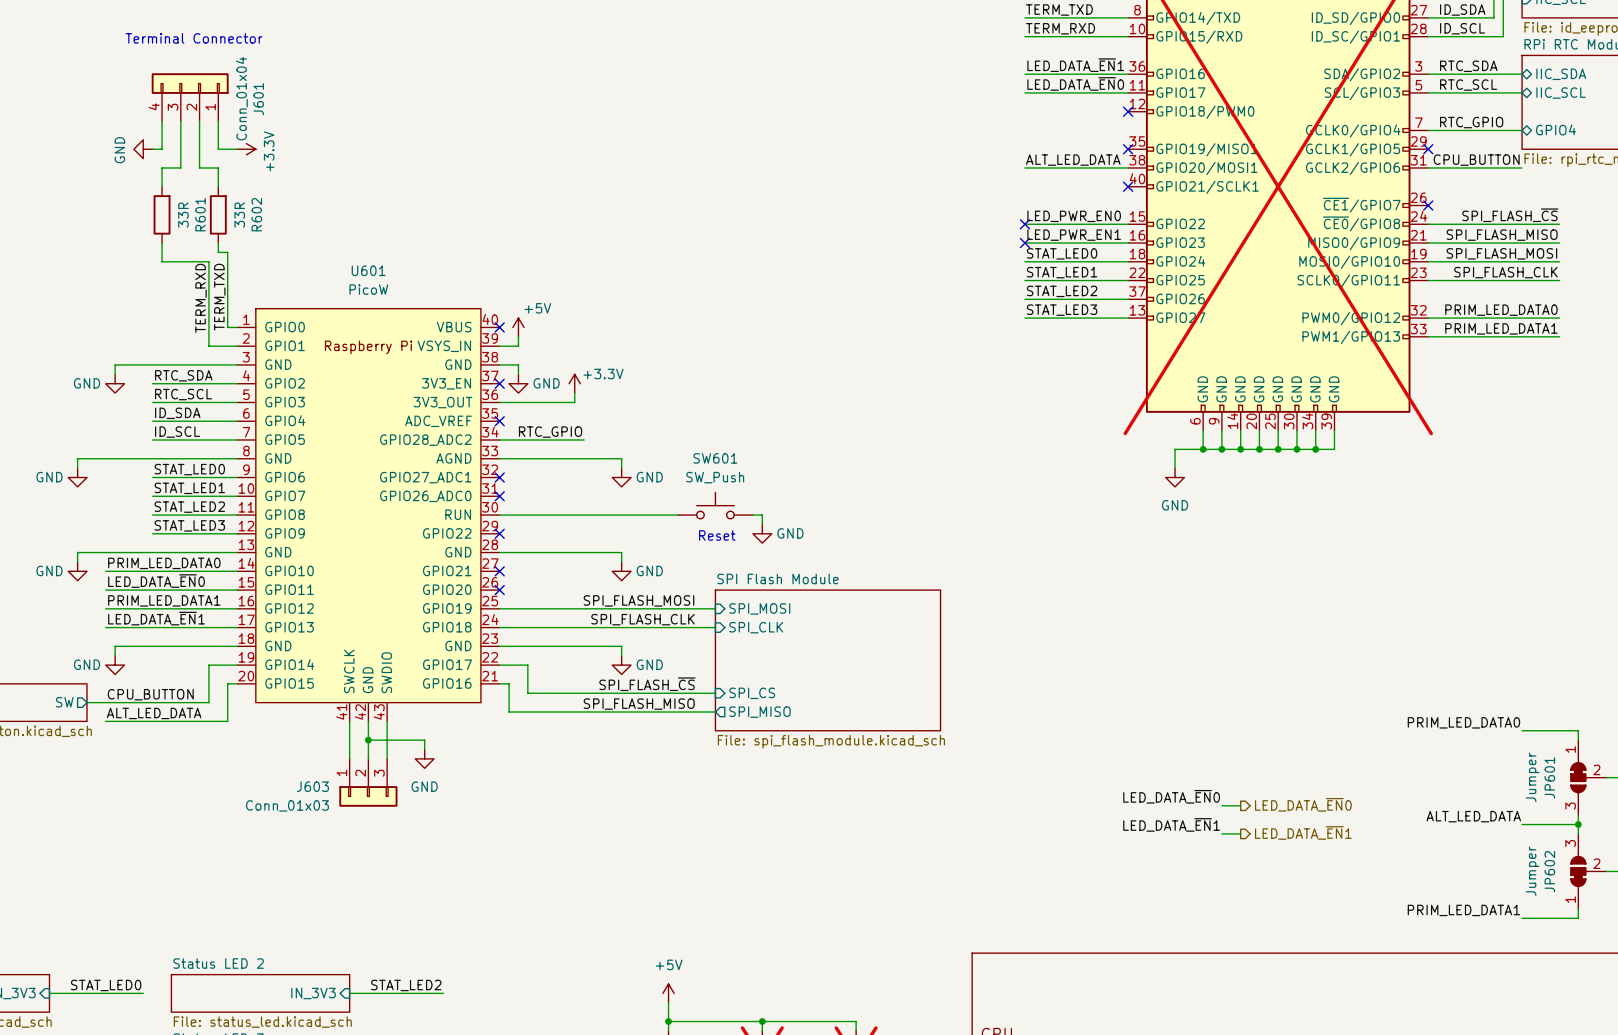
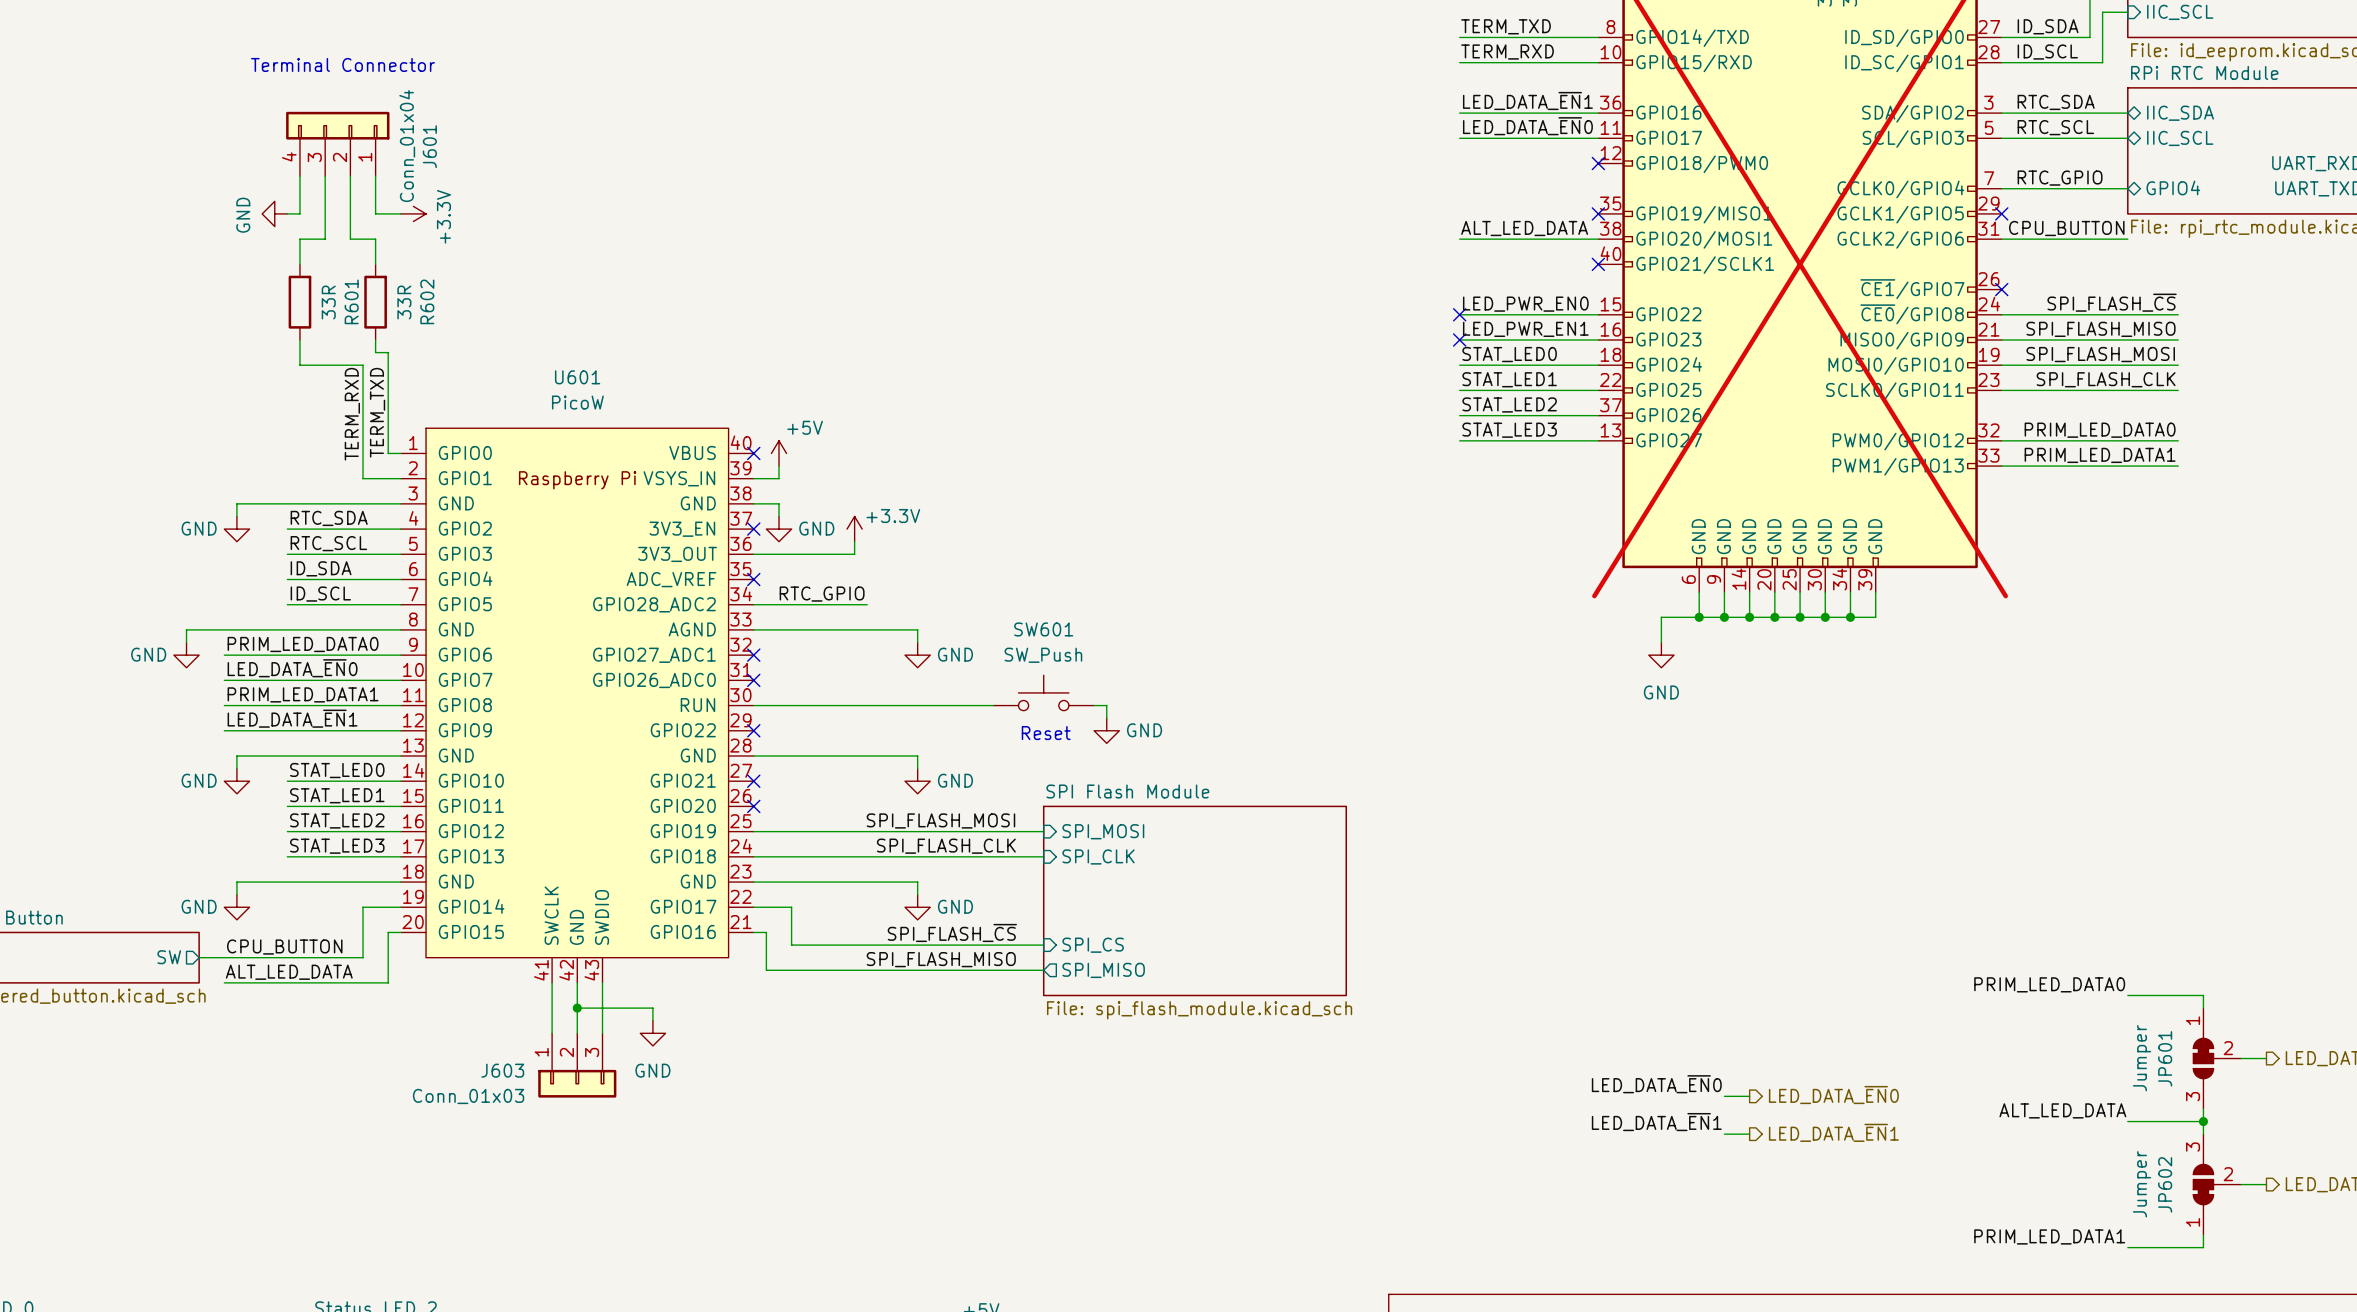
label position: STAT_LED0 (189, 469) -> STAT_LED0 (337, 770)
label position: STAT_LED1 (189, 488) -> STAT_LED1 (337, 795)
label position: STAT_LED2 (189, 507) -> STAT_LED2 (337, 820)
label position: STAT_LED3 (189, 525) -> STAT_LED3 (337, 846)
wire: (115, 552) (77, 552) (77, 561) -> (236, 755) (236, 768)
label position: PRIM_LED_DATA0 (164, 563) -> PRIM_LED_DATA0 (303, 644)
power symbol position: GND (77, 571) -> GND (236, 781)
wire: (105, 571) (152, 571) -> (224, 655) (287, 655)
label position: LED_DATA_~{EN}0 (156, 581) -> LED_DATA_~{EN}0 (292, 668)
wire: (105, 590) (152, 590) -> (224, 680) (287, 680)
label position: PRIM_LED_DATA1 (164, 600) -> PRIM_LED_DATA1 (303, 694)
wire: (105, 608) (152, 608) -> (224, 705) (287, 705)
label position: LED_DATA_~{EN}1 (156, 618) -> LED_DATA_~{EN}1 (292, 718)
wire: (105, 627) (152, 627) -> (224, 730) (287, 730)

